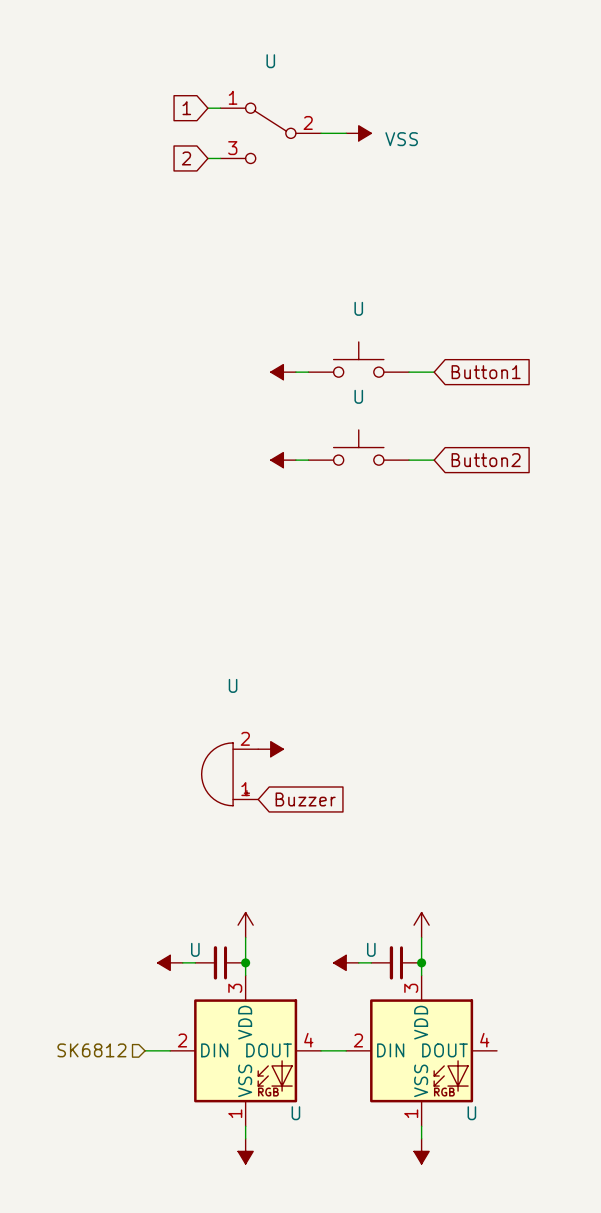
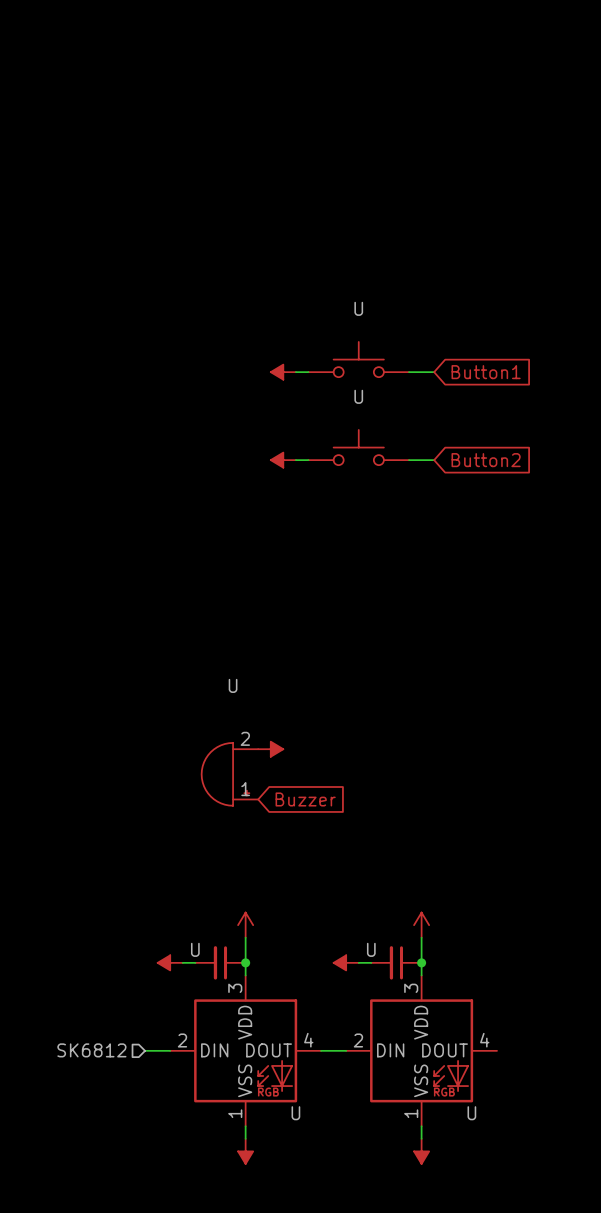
global label: 1 (186, 108) -> none
wire: (207, 108) (220, 108) -> none
U: (270, 133) -> none
wire: (321, 133) (346, 133) -> none
power symbol: VSS (358, 133) -> none
global label: 2 (186, 158) -> none
wire: (207, 158) (220, 158) -> none

